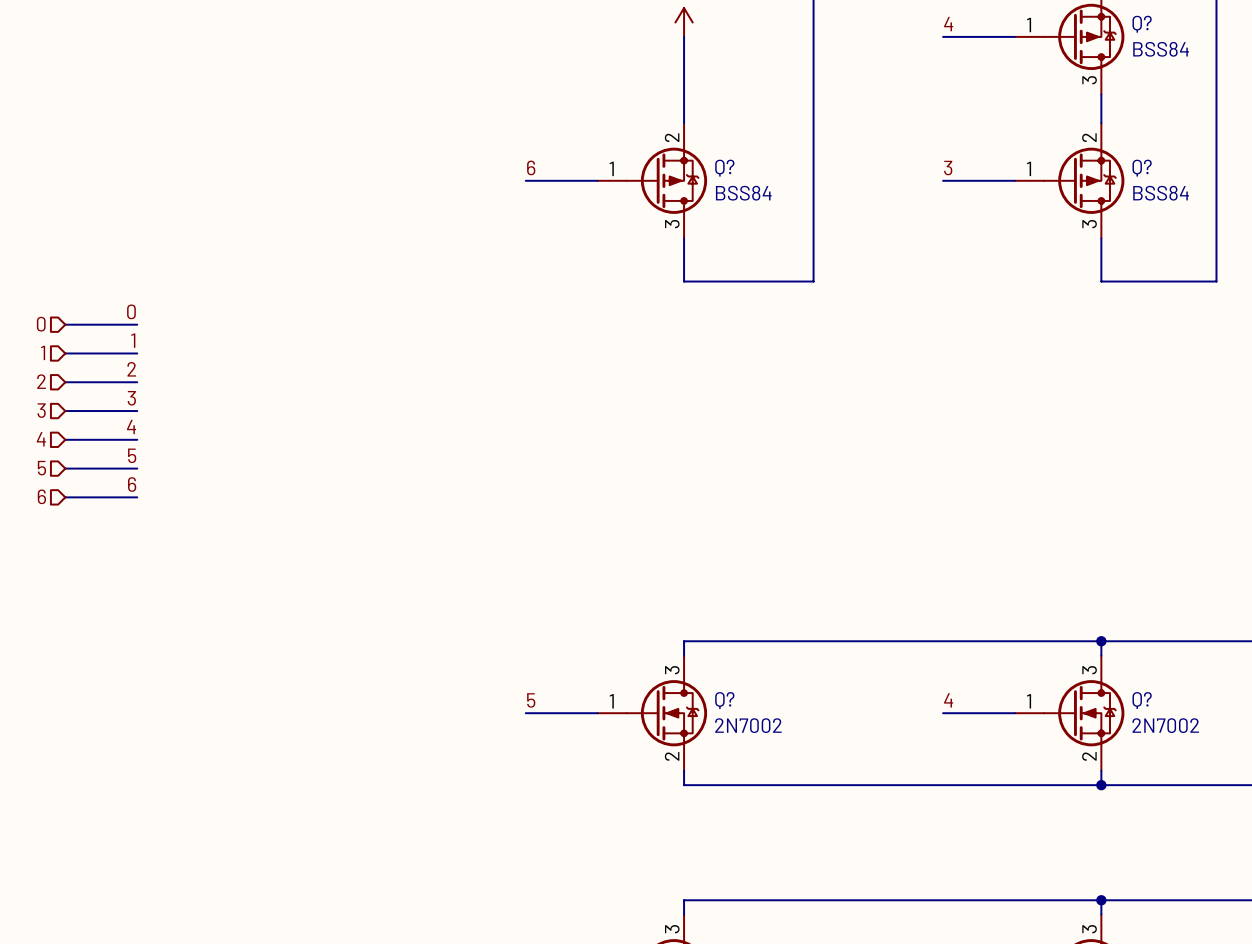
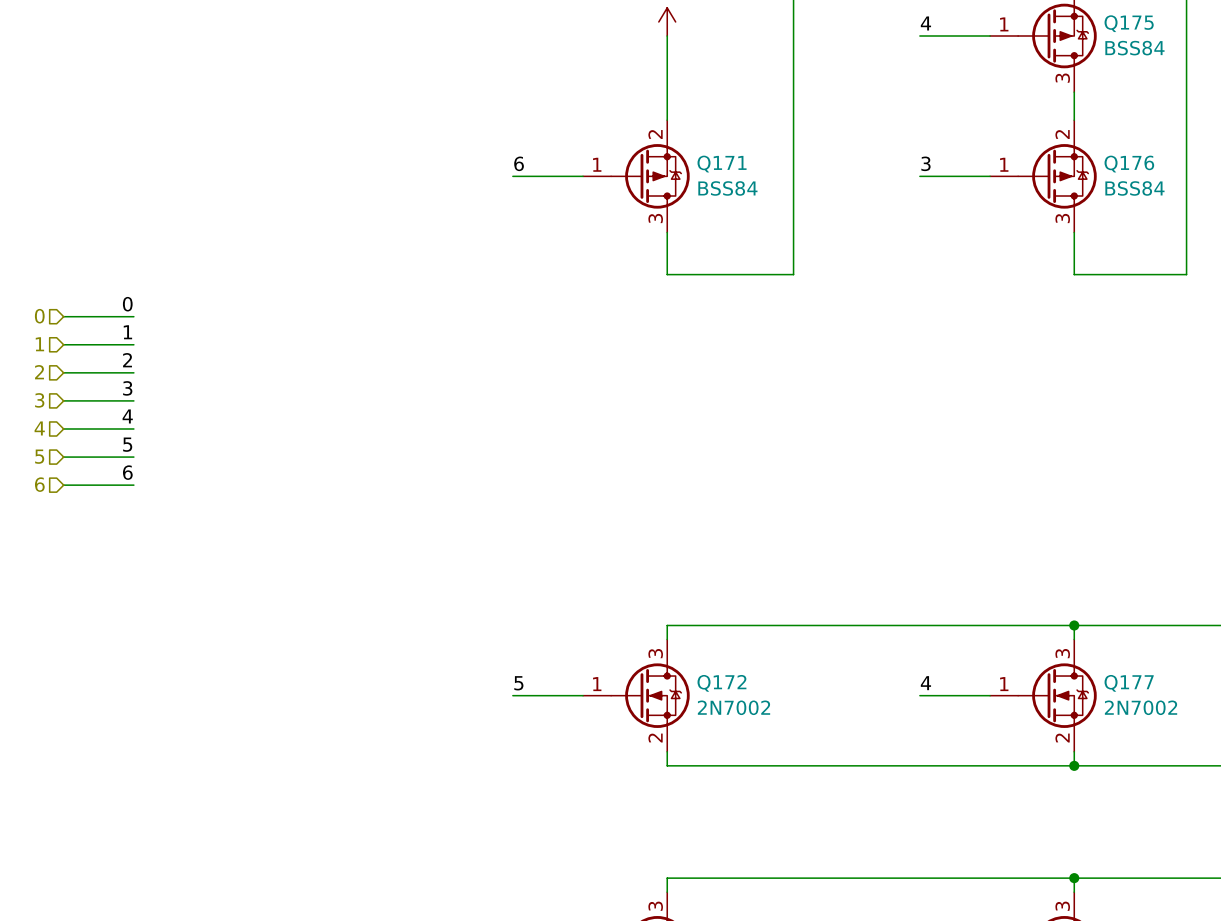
Q? name: Q? (1142, 24) -> Q175 (1129, 23)
Q? name: Q? (724, 168) -> Q171 (722, 164)
Q? name: Q? (1142, 168) -> Q176 (1129, 164)
Q? name: Q? (724, 700) -> Q172 (721, 683)
Q? name: Q? (1142, 700) -> Q177 (1129, 683)

